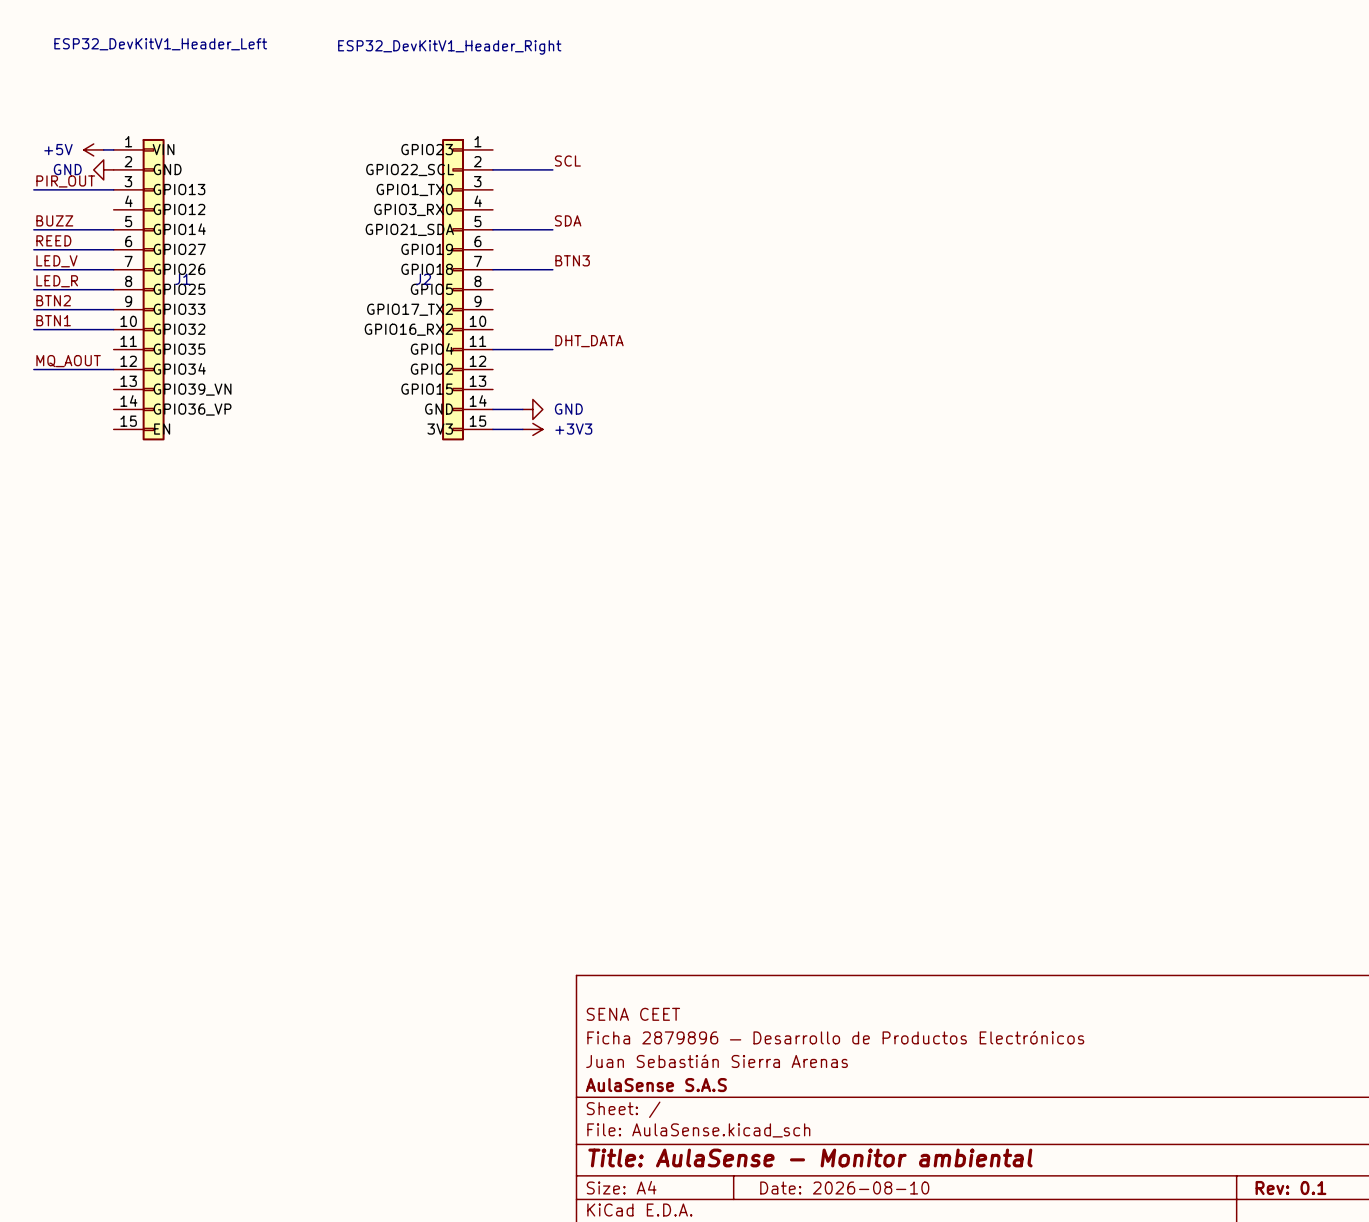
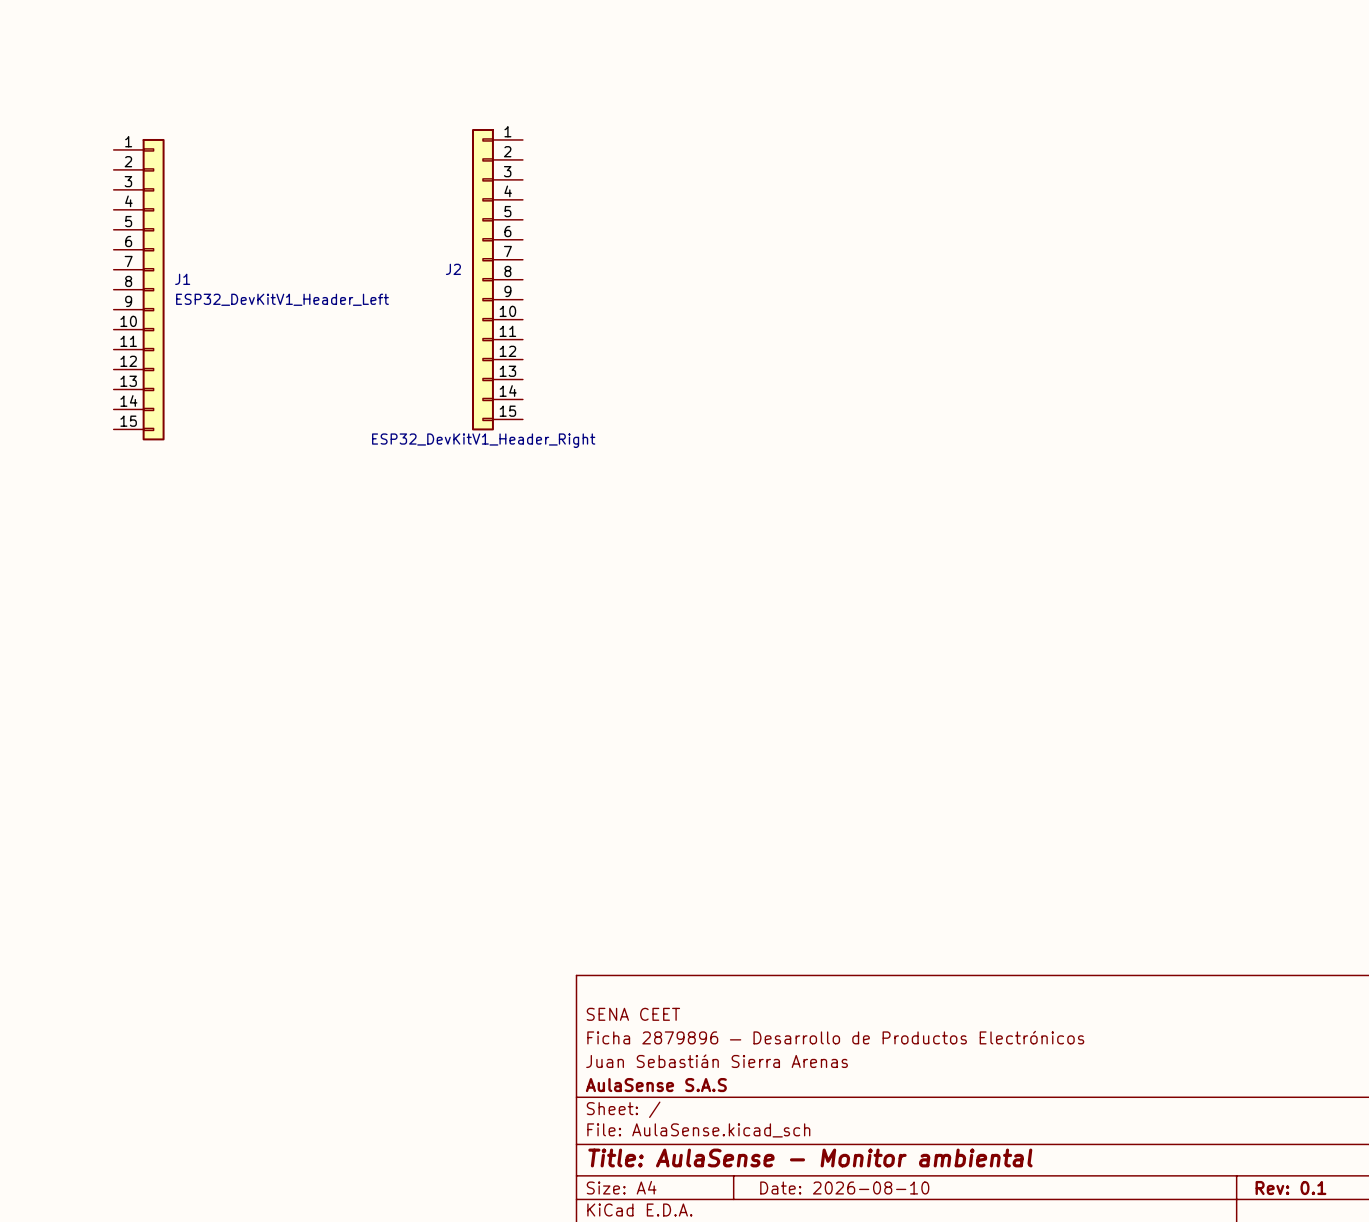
J1 value position: ESP32_DevKitV1_Header_Left (160, 44) -> ESP32_DevKitV1_Header_Left (282, 299)
J2 value position: ESP32_DevKitV1_Header_Right (449, 47) -> ESP32_DevKitV1_Header_Right (483, 440)
J1 symbol: [113, 138, 165, 441] -> [113, 138, 165, 441]
J2 symbol: [442, 138, 493, 441] -> [471, 128, 523, 431]
power symbol: +5V (93, 149) -> none
wire: (103, 149) (113, 149) -> none
label: SCL (567, 161) -> none
power symbol: GND (103, 169) -> none
wire: (492, 169) (552, 169) -> none
label: PIR_OUT (65, 181) -> none
wire: (33, 189) (113, 189) -> none
label: BUZZ (54, 220) -> none
label: SDA (568, 220) -> none
wire: (33, 229) (113, 229) -> none
wire: (492, 229) (552, 229) -> none
label: REED (53, 240) -> none
wire: (33, 249) (113, 249) -> none
label: BTN3 (572, 260) -> none
label: LED_V (56, 261) -> none
wire: (33, 269) (113, 269) -> none
wire: (492, 269) (552, 269) -> none
label: LED_R (57, 281) -> none
wire: (33, 289) (113, 289) -> none
label: BTN2 (53, 300) -> none
wire: (33, 309) (113, 309) -> none
label: BTN1 (53, 320) -> none
wire: (33, 329) (113, 329) -> none
label: DHT_DATA (589, 341) -> none
wire: (492, 349) (552, 349) -> none
label: MQ_AOUT (68, 361) -> none
wire: (33, 369) (113, 369) -> none
wire: (492, 409) (522, 409) -> none
power symbol: GND (532, 409) -> none
wire: (492, 429) (522, 429) -> none
power symbol: +3V3 (532, 429) -> none

